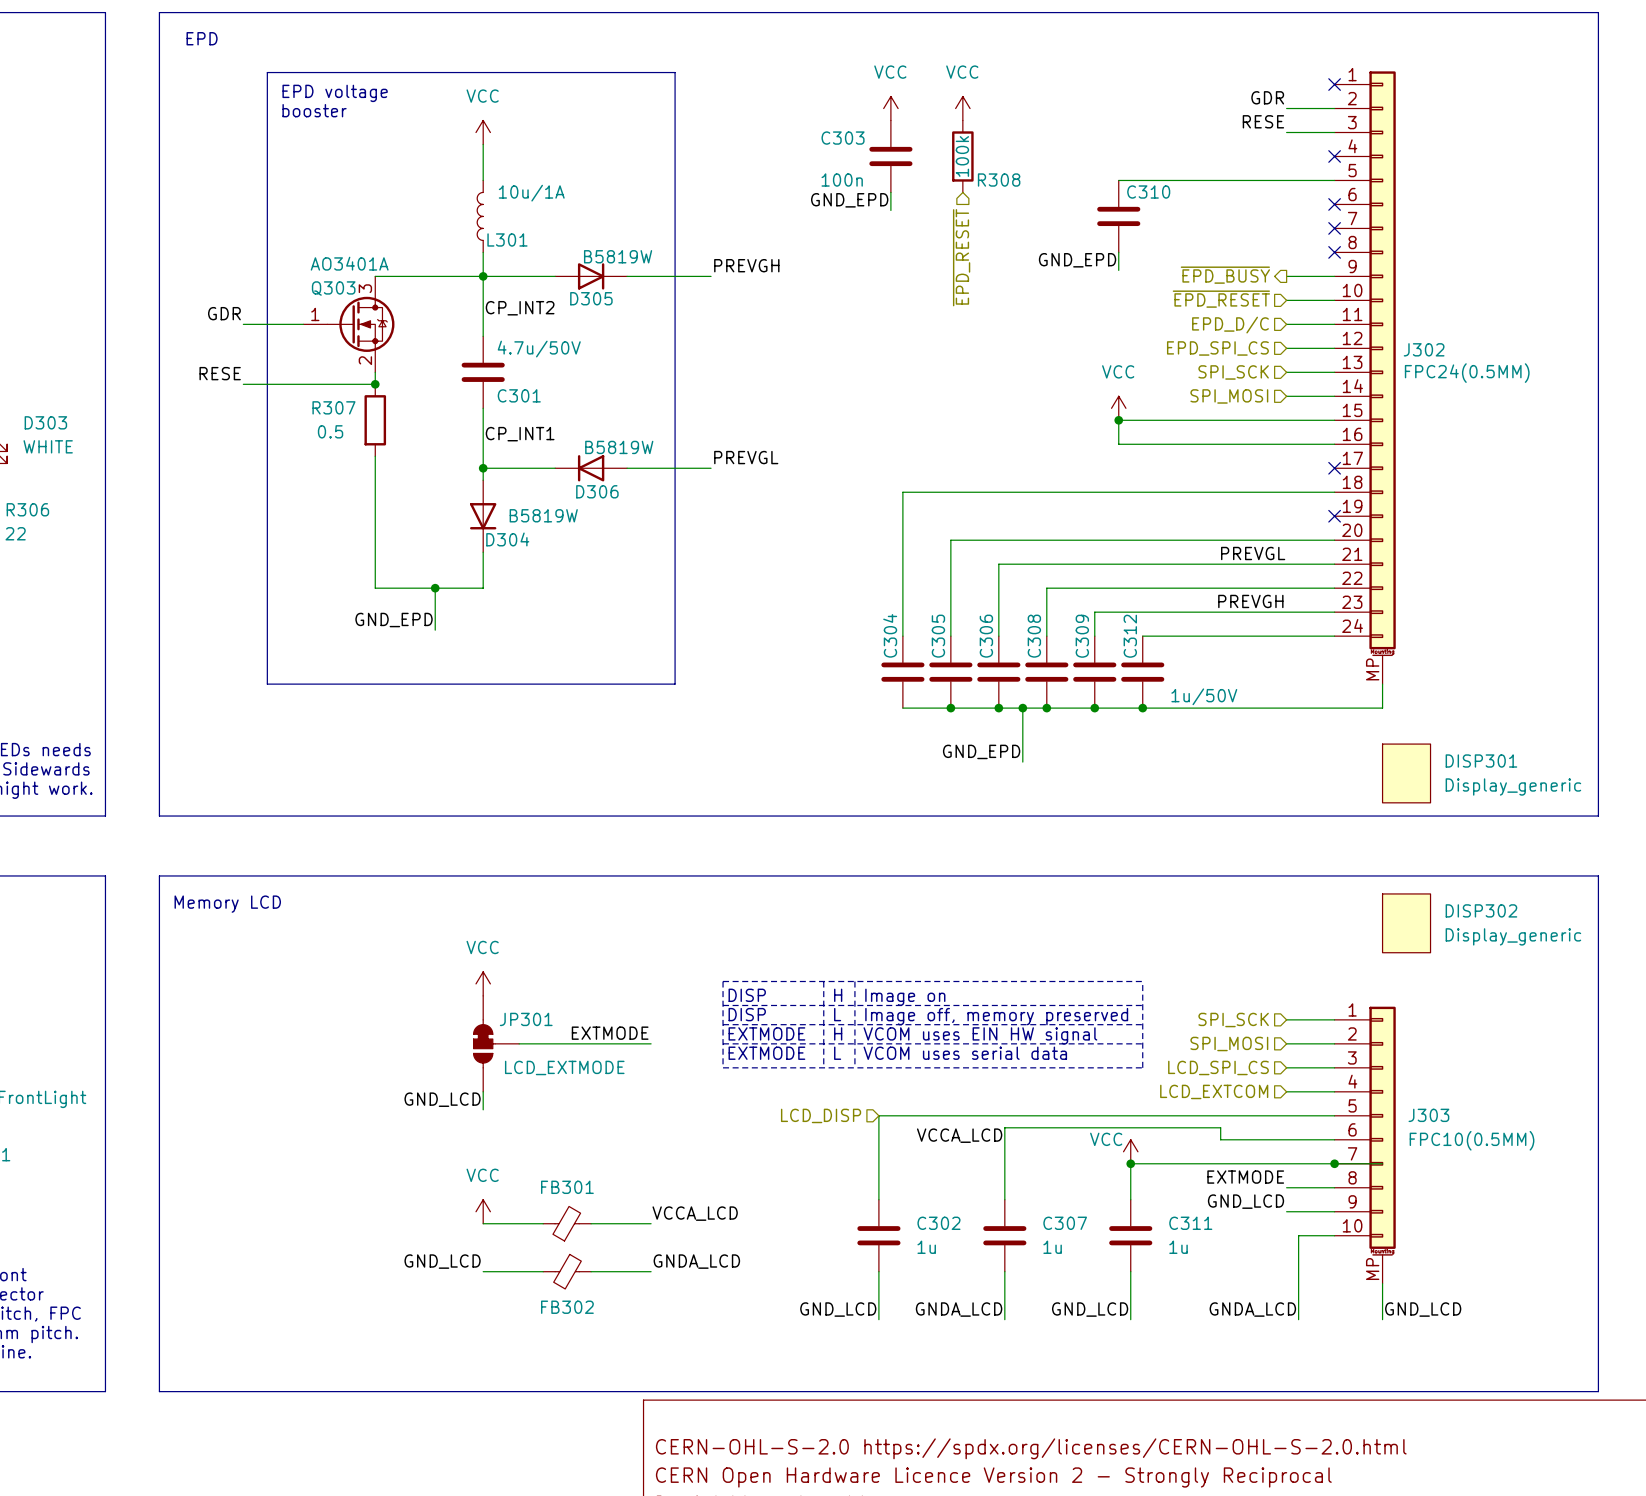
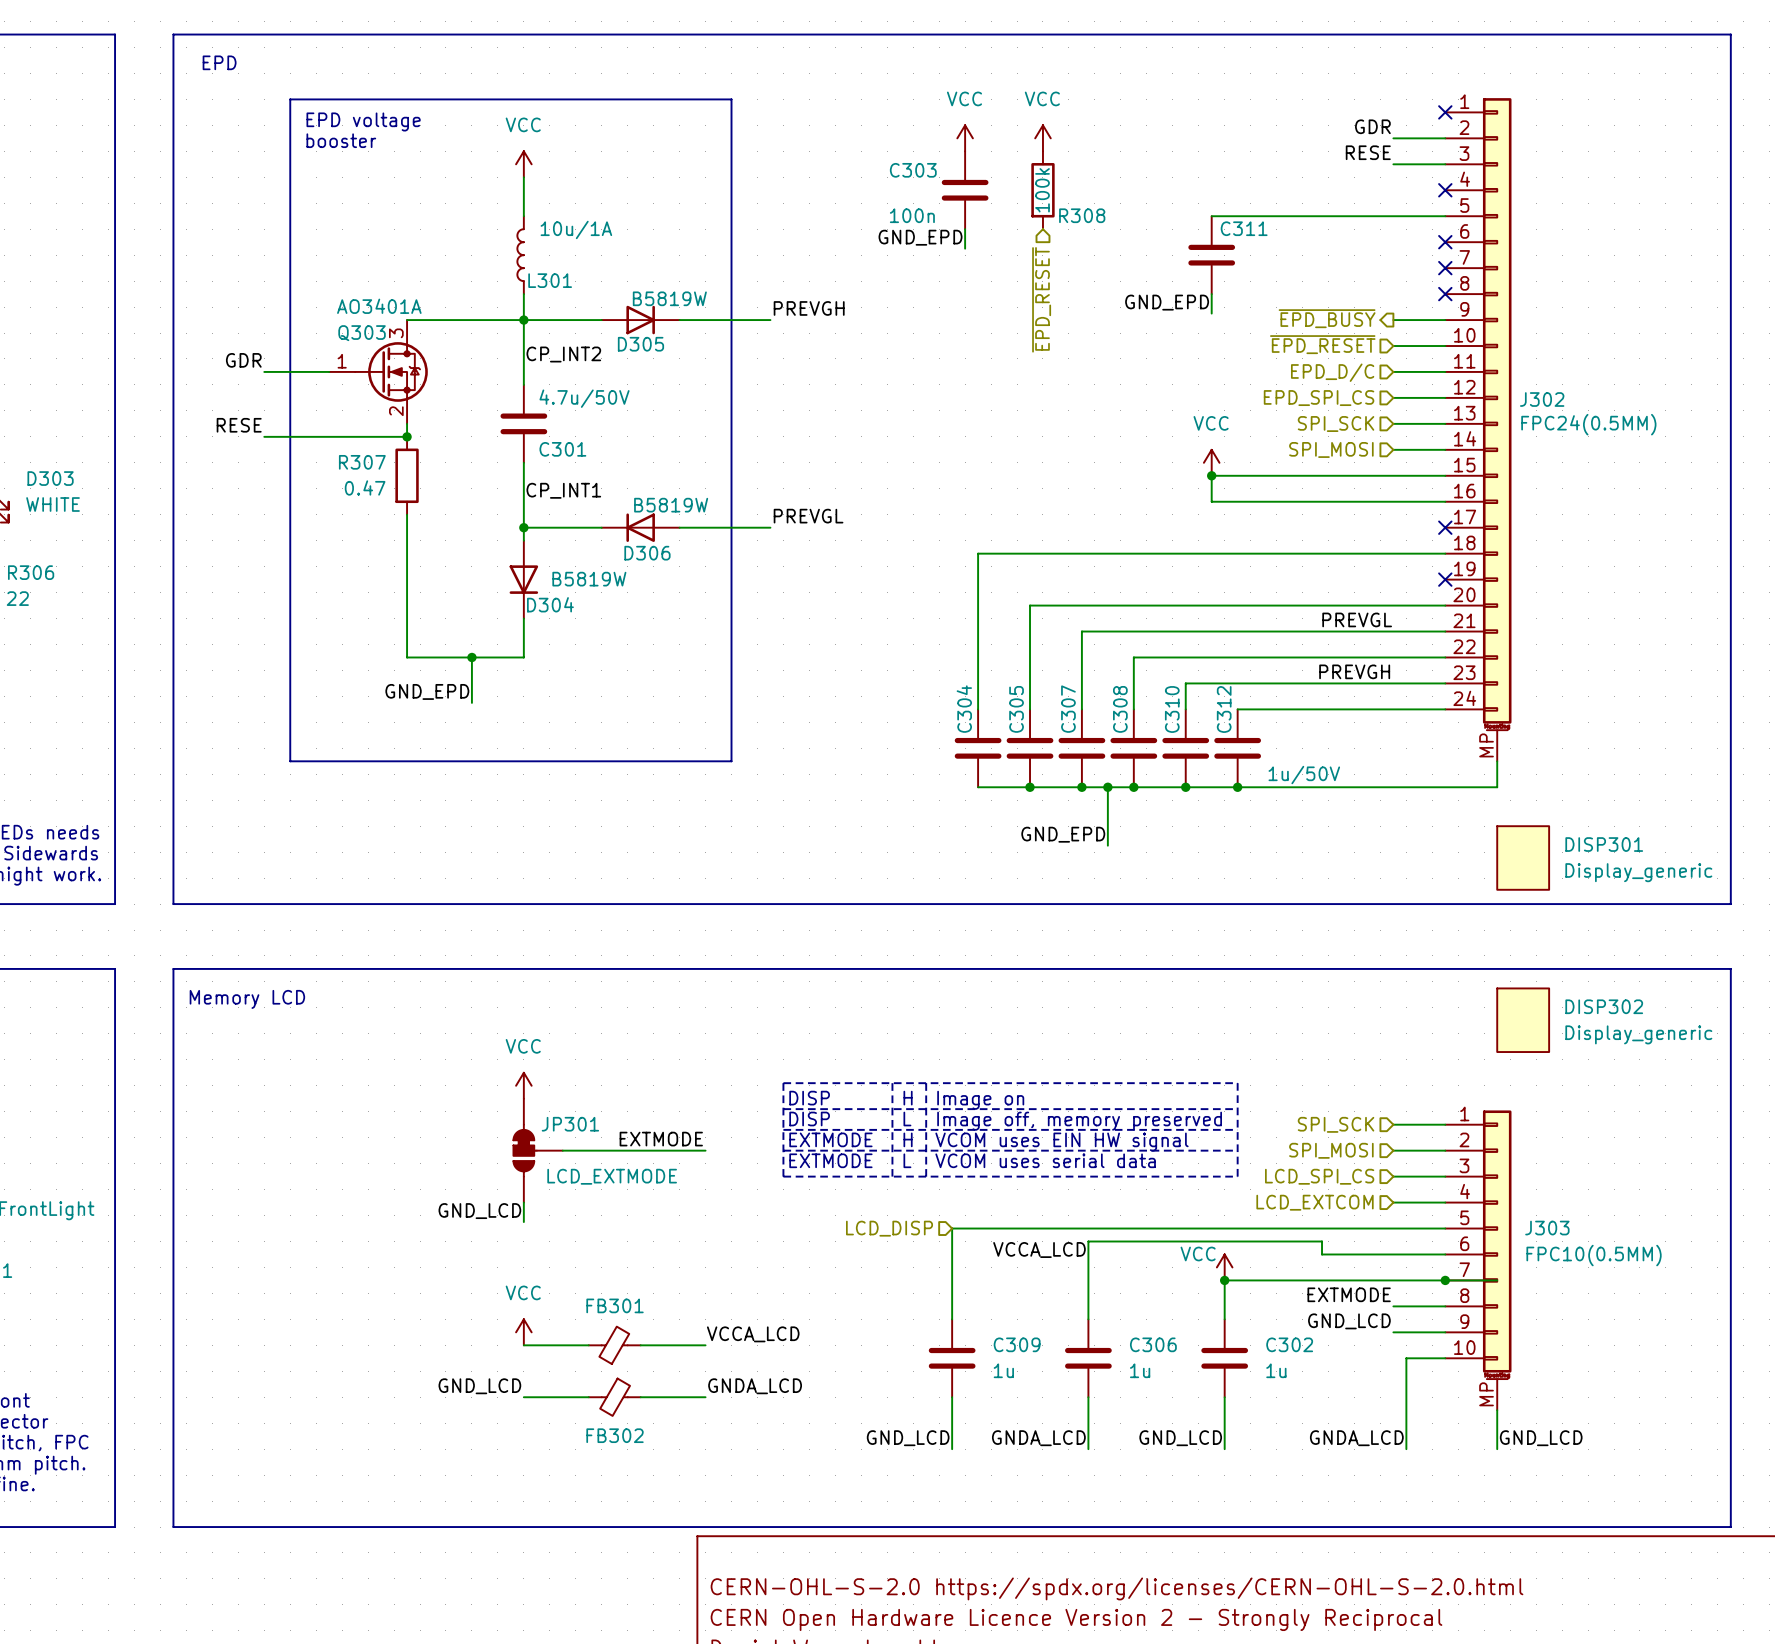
C310 name: C310 (1148, 192) -> C311 (1244, 228)
R307 value: 0.5 (330, 431) -> 0.47 (365, 487)
C306 name: C306 (986, 636) -> C307 (1068, 709)
C309 name: C309 (1082, 636) -> C310 (1172, 709)
C302 name: C302 (938, 1223) -> C309 (1017, 1344)
C307 name: C307 (1065, 1223) -> C306 (1153, 1344)
C311 name: C311 (1190, 1223) -> C302 (1289, 1344)

